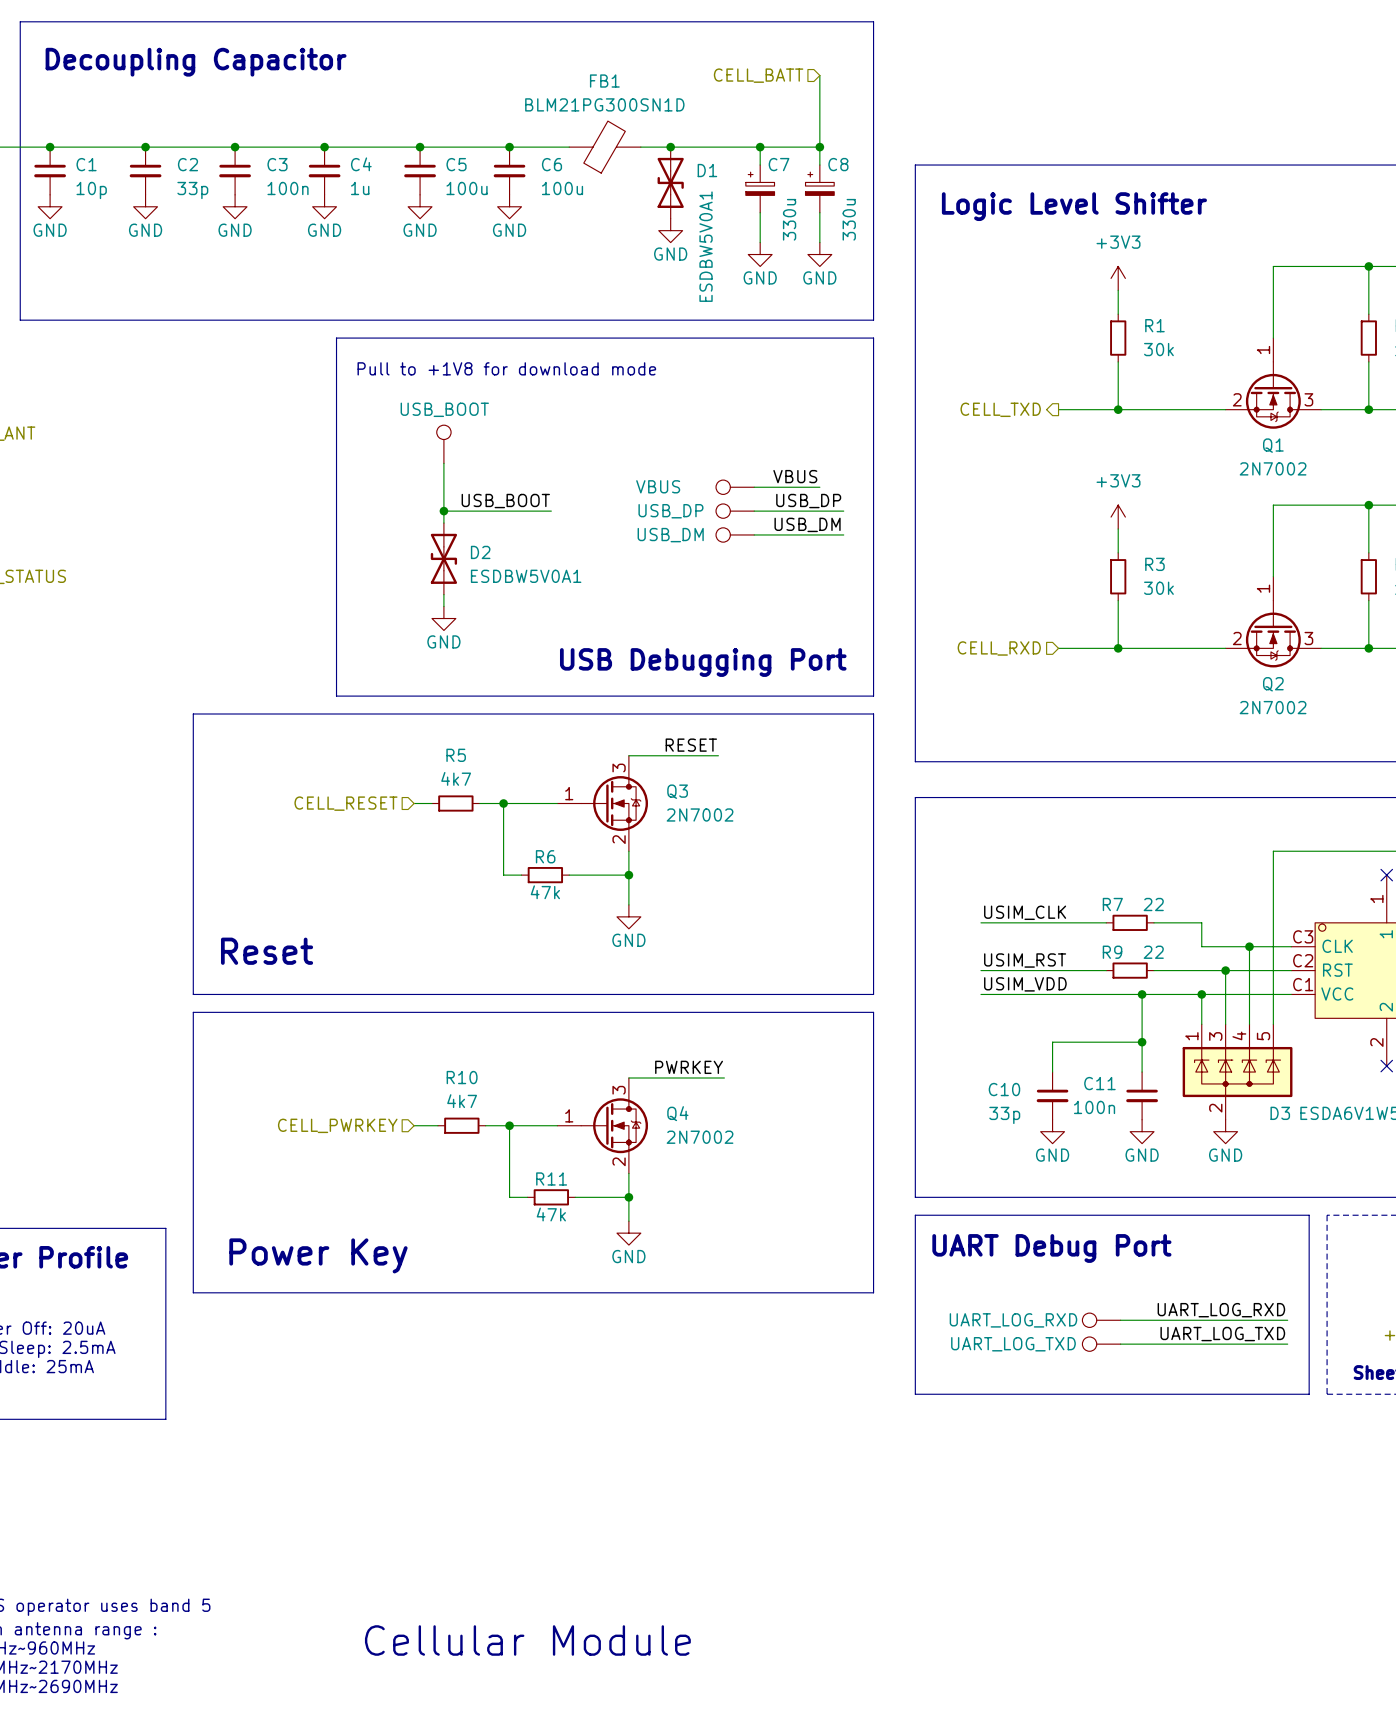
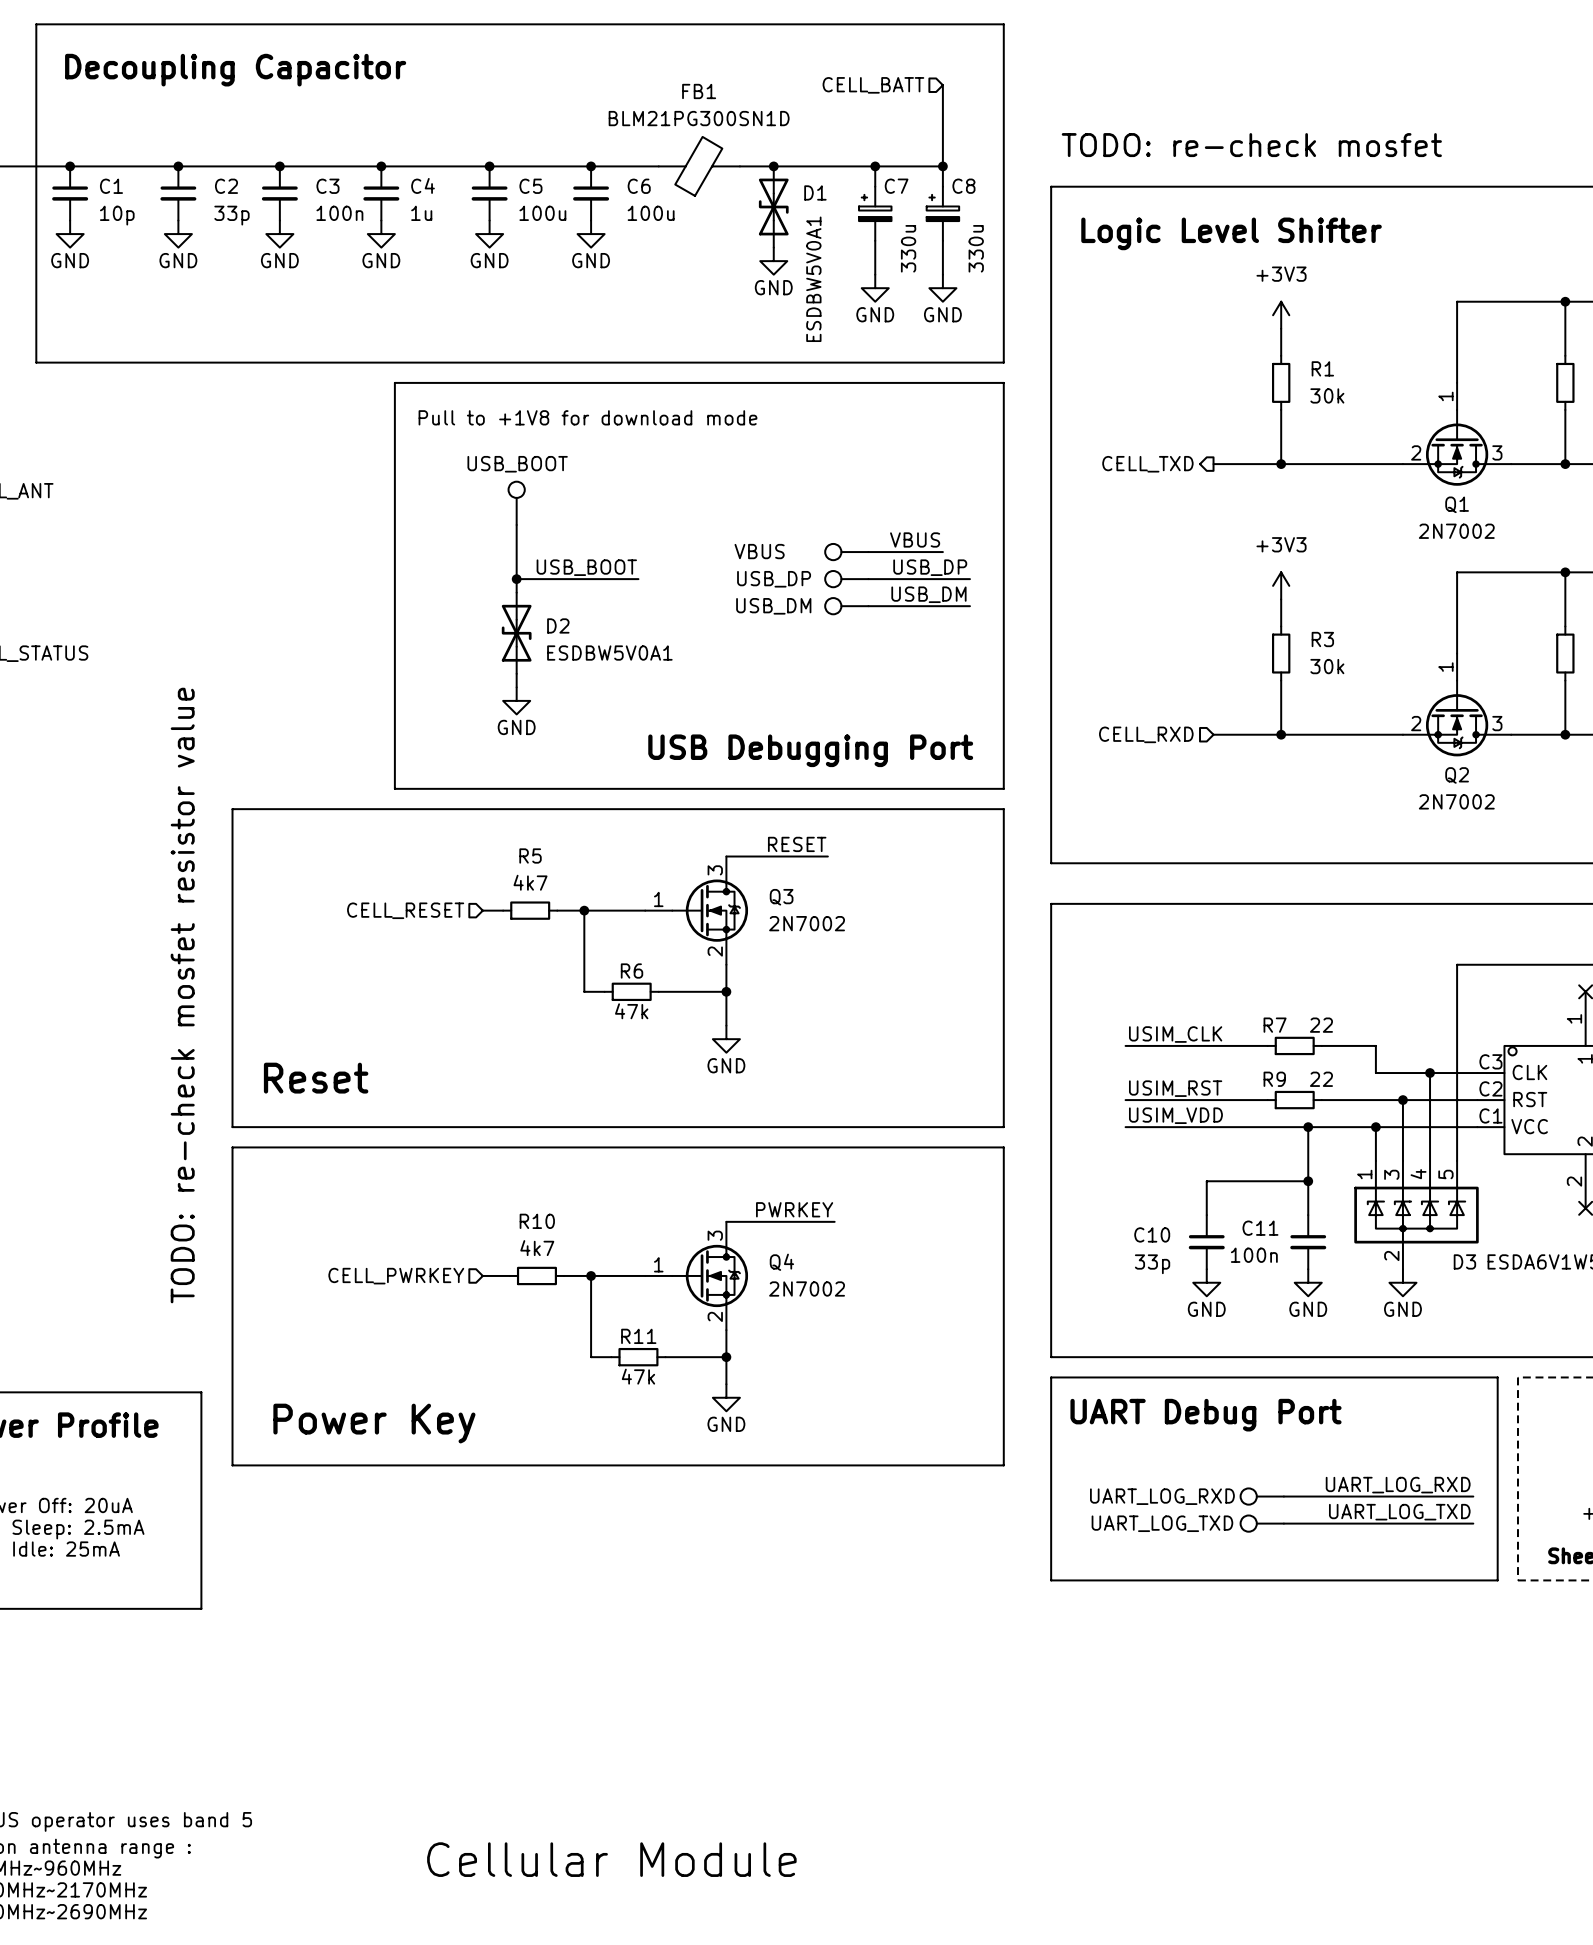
text: none -> TODO: re-check mosfet (1251, 145)
text: none -> TODO: re-check mosfet resistor value (182, 995)

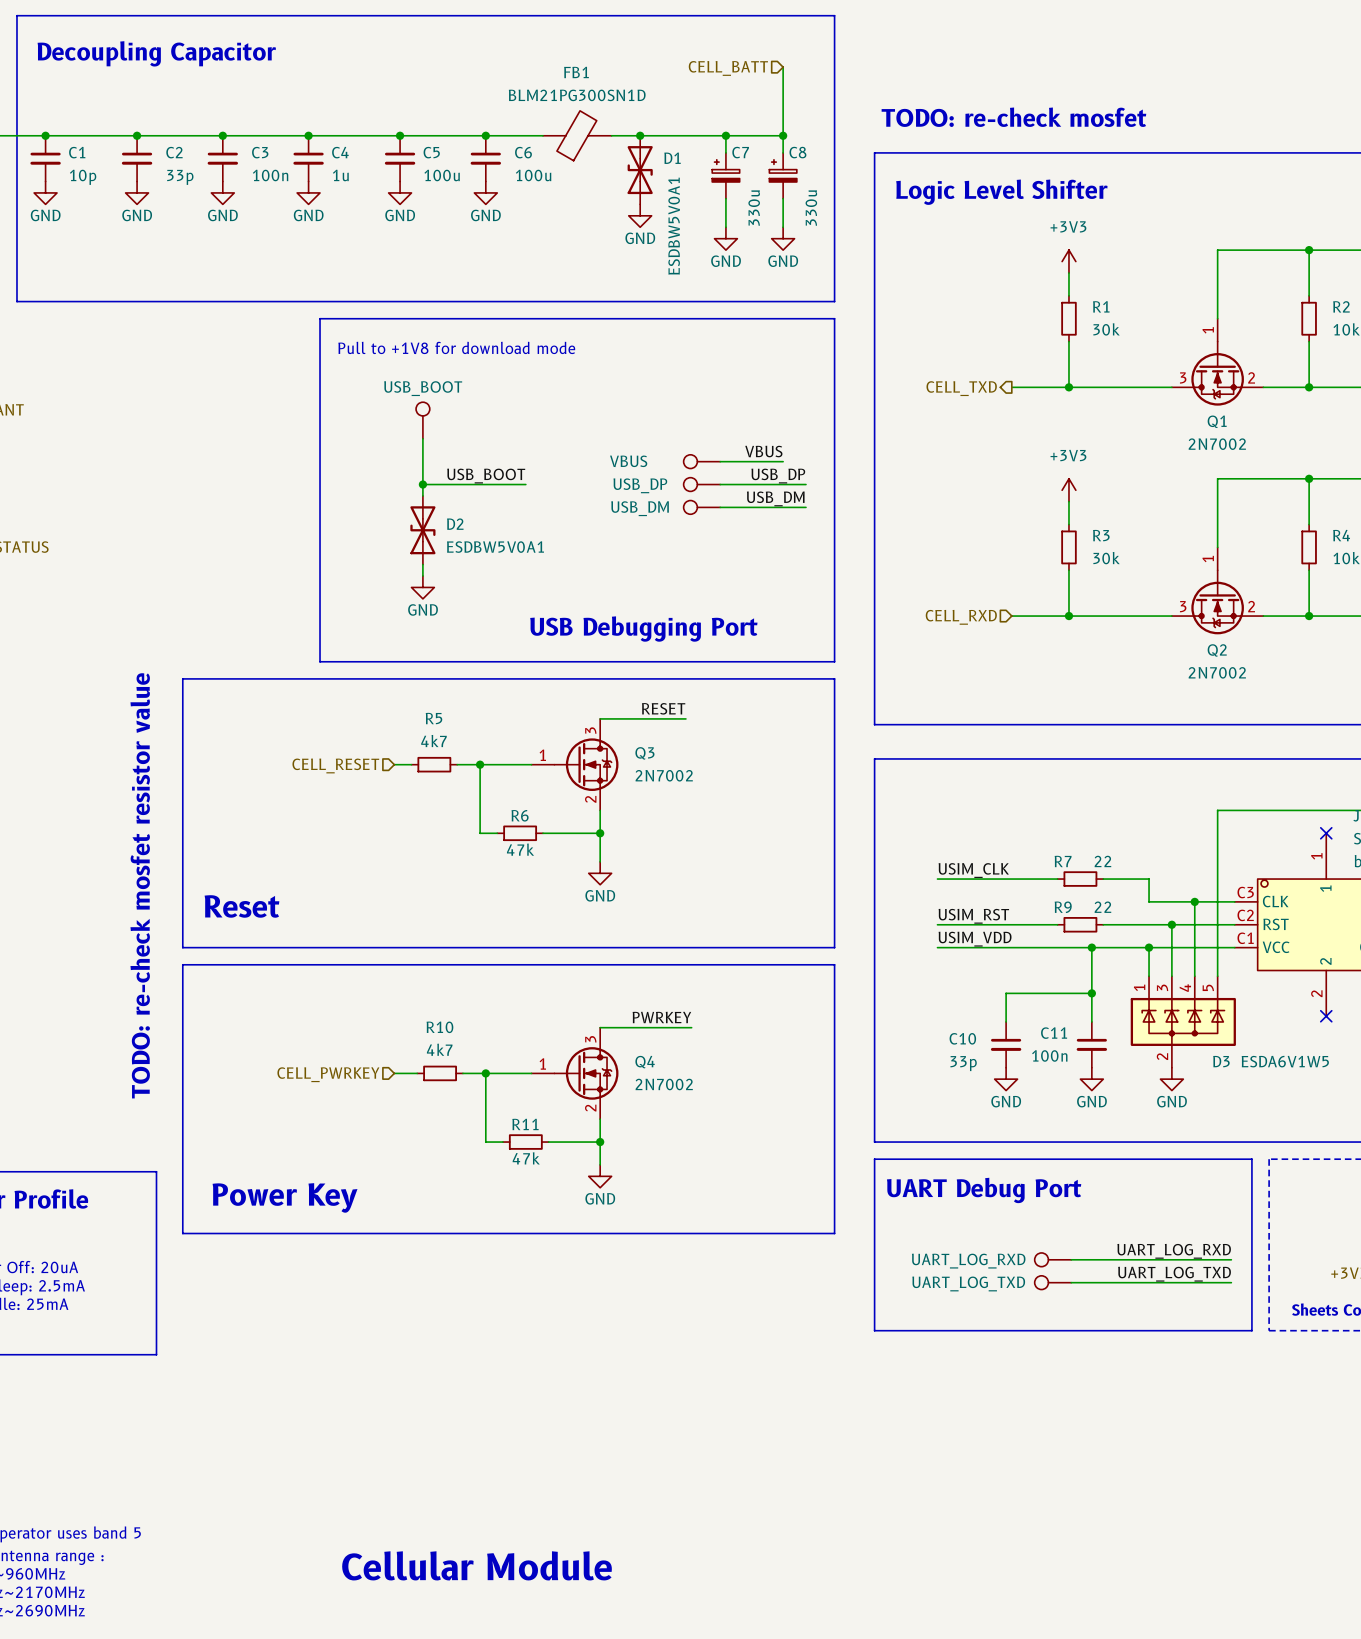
Q1 flip: as is (1457, 447) -> left-right (1217, 373)
Q2 flip: as is (1457, 718) -> left-right (1217, 602)

